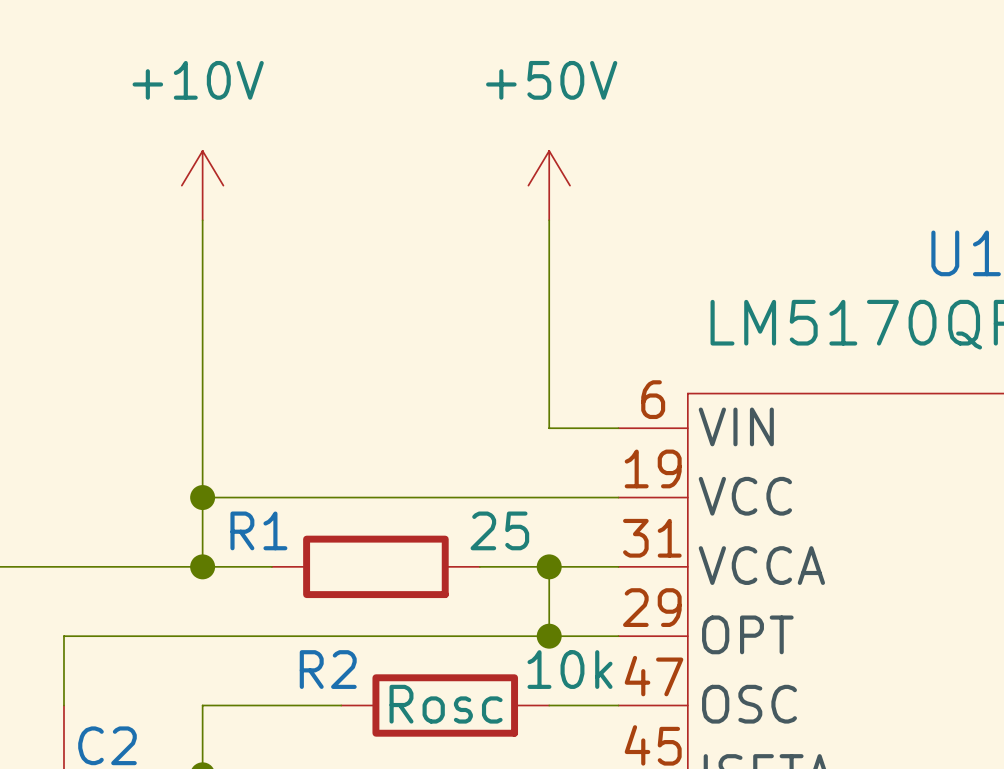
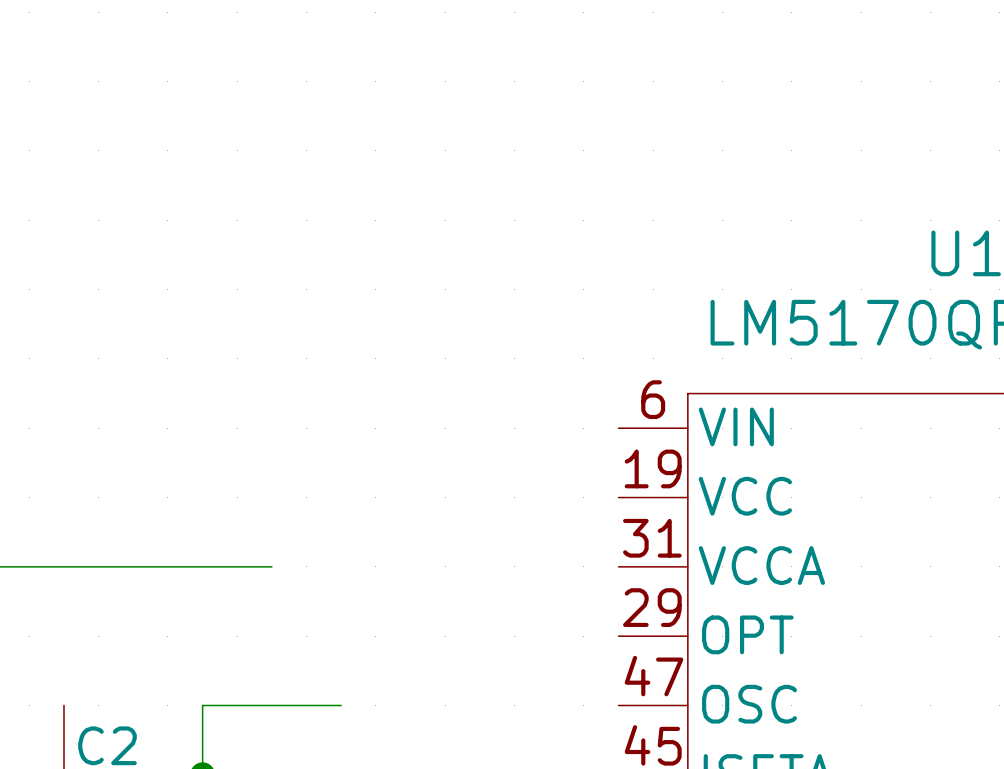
power symbol: +10V (202, 185) -> none
power symbol: +50V (549, 185) -> none
wire: (202, 220) (202, 566) -> none
wire: (549, 220) (549, 428) (618, 428) -> none
wire: (202, 497) (618, 497) -> none
junction: (202, 497) -> none
junction: (202, 566) -> none
R1: 25 (375, 566) -> none
wire: (479, 566) (618, 566) -> none
wire: (549, 566) (549, 636) -> none
junction: (549, 566) -> none
junction: (549, 636) -> none
wire: (618, 636) (63, 636) (63, 705) -> none
R2: 10k (445, 705) -> none
wire: (549, 705) (618, 705) -> none

